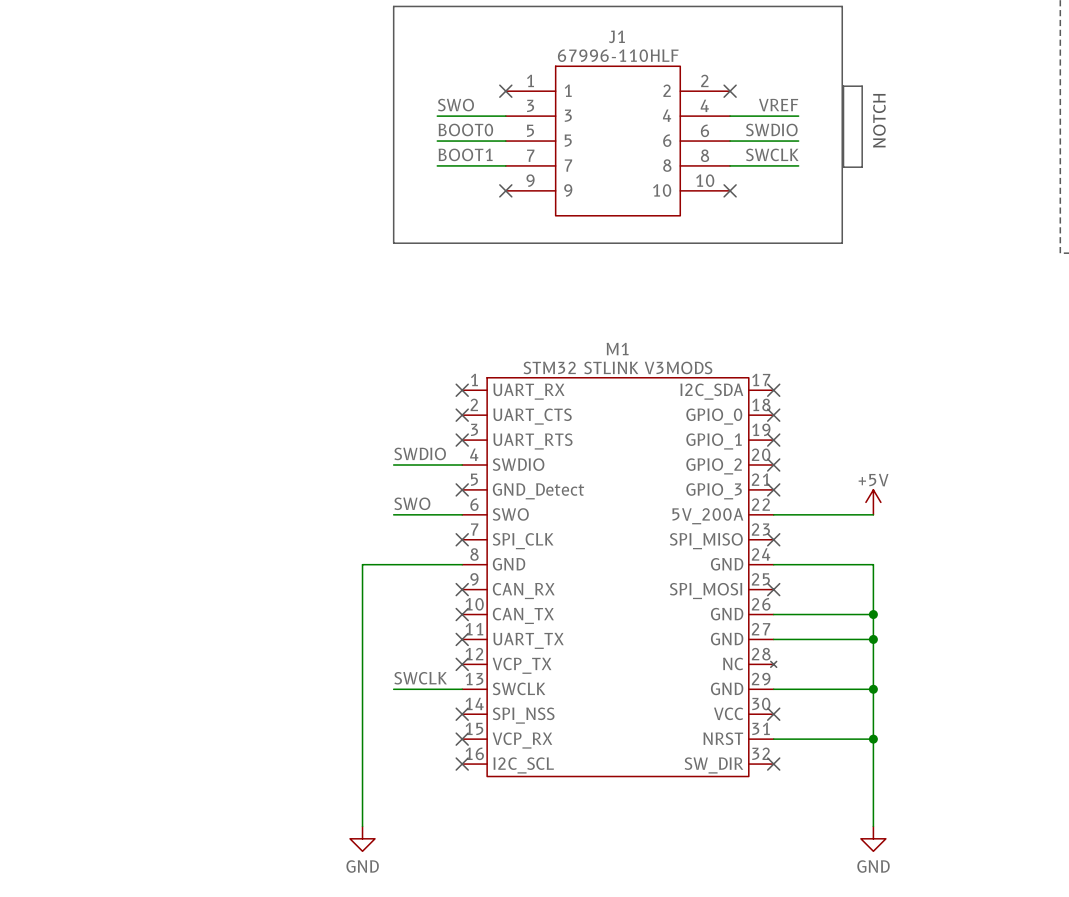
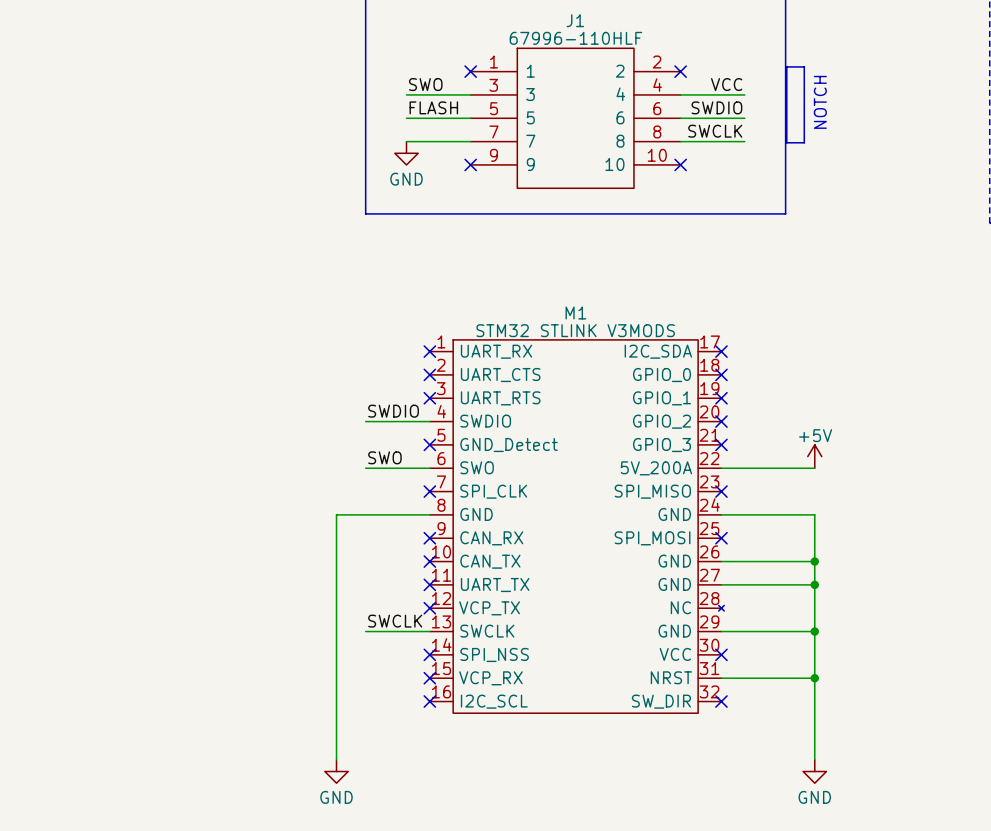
label: VREF (778, 105) -> VCC (726, 84)
label: BOOT0 (465, 129) -> FLASH (433, 107)
label: BOOT1 (465, 154) -> none
power symbol: none -> GND (406, 153)

